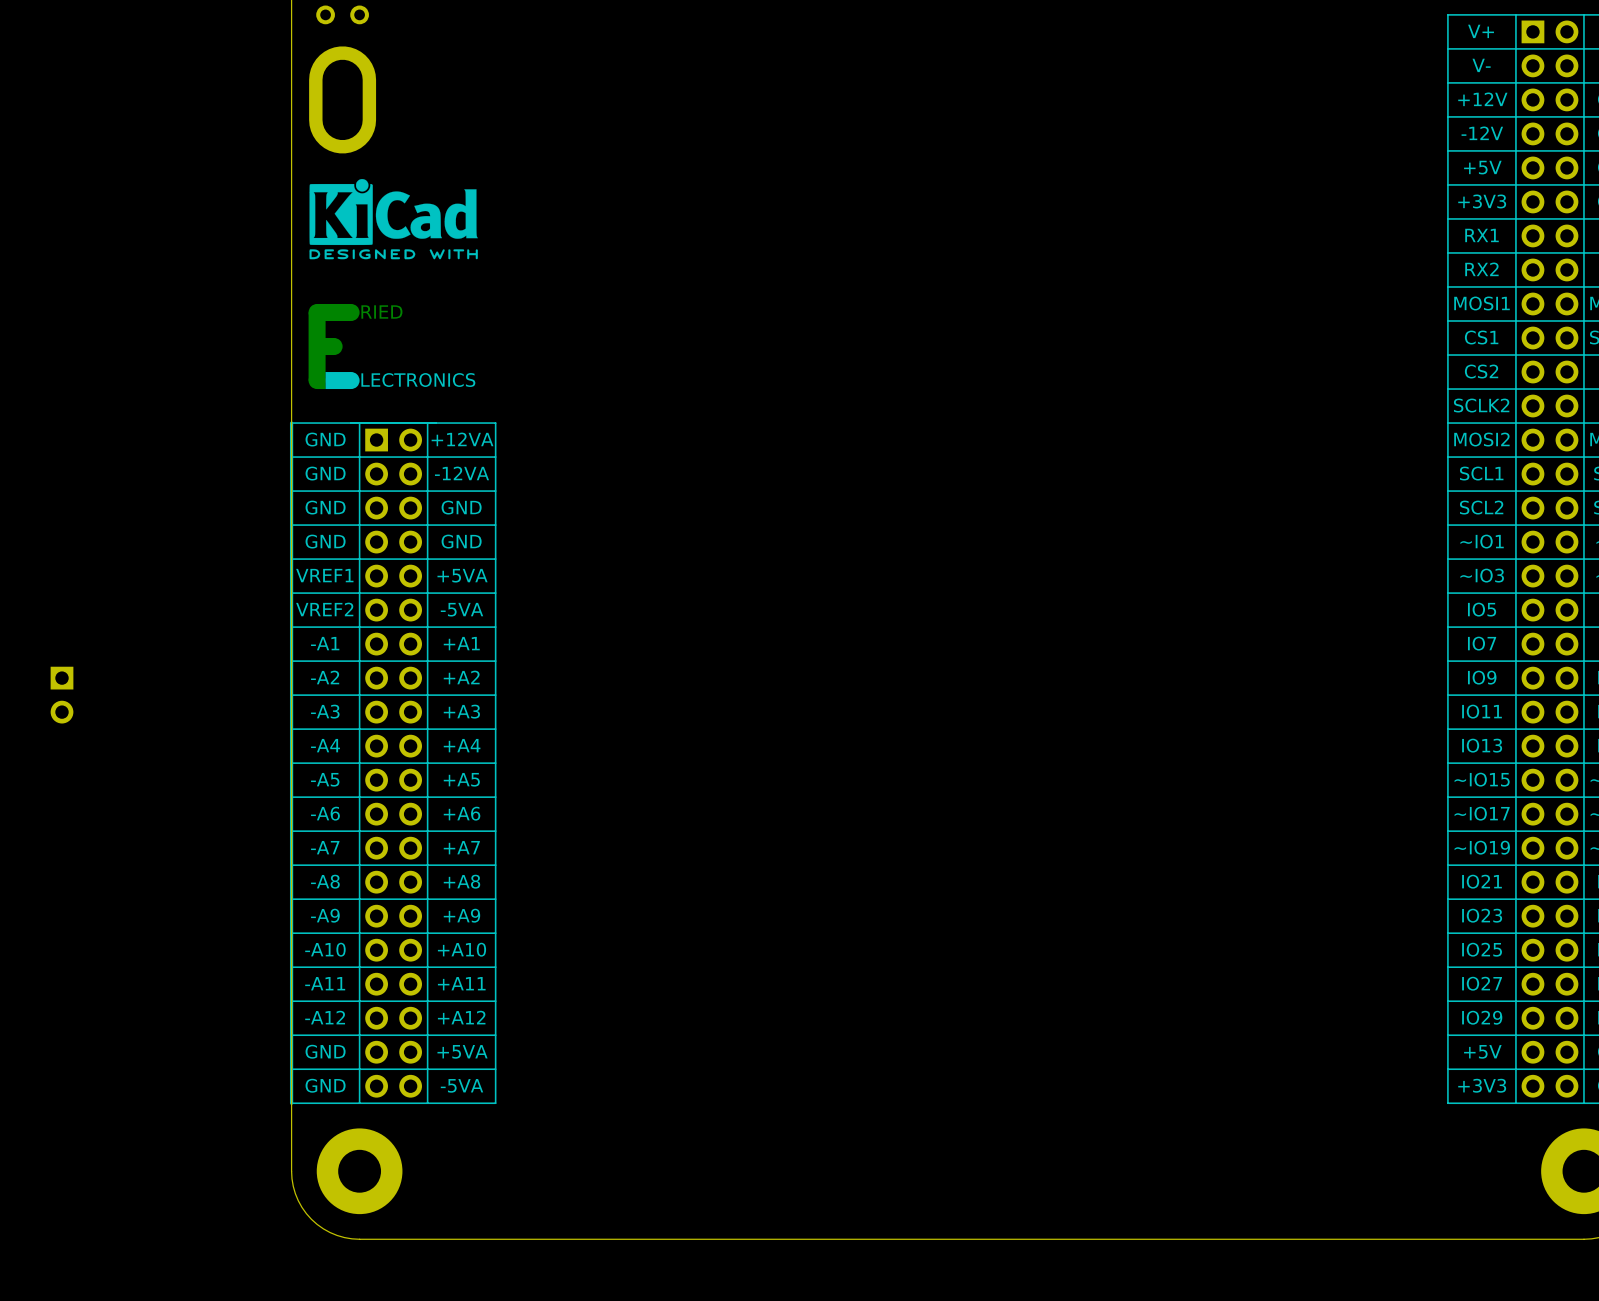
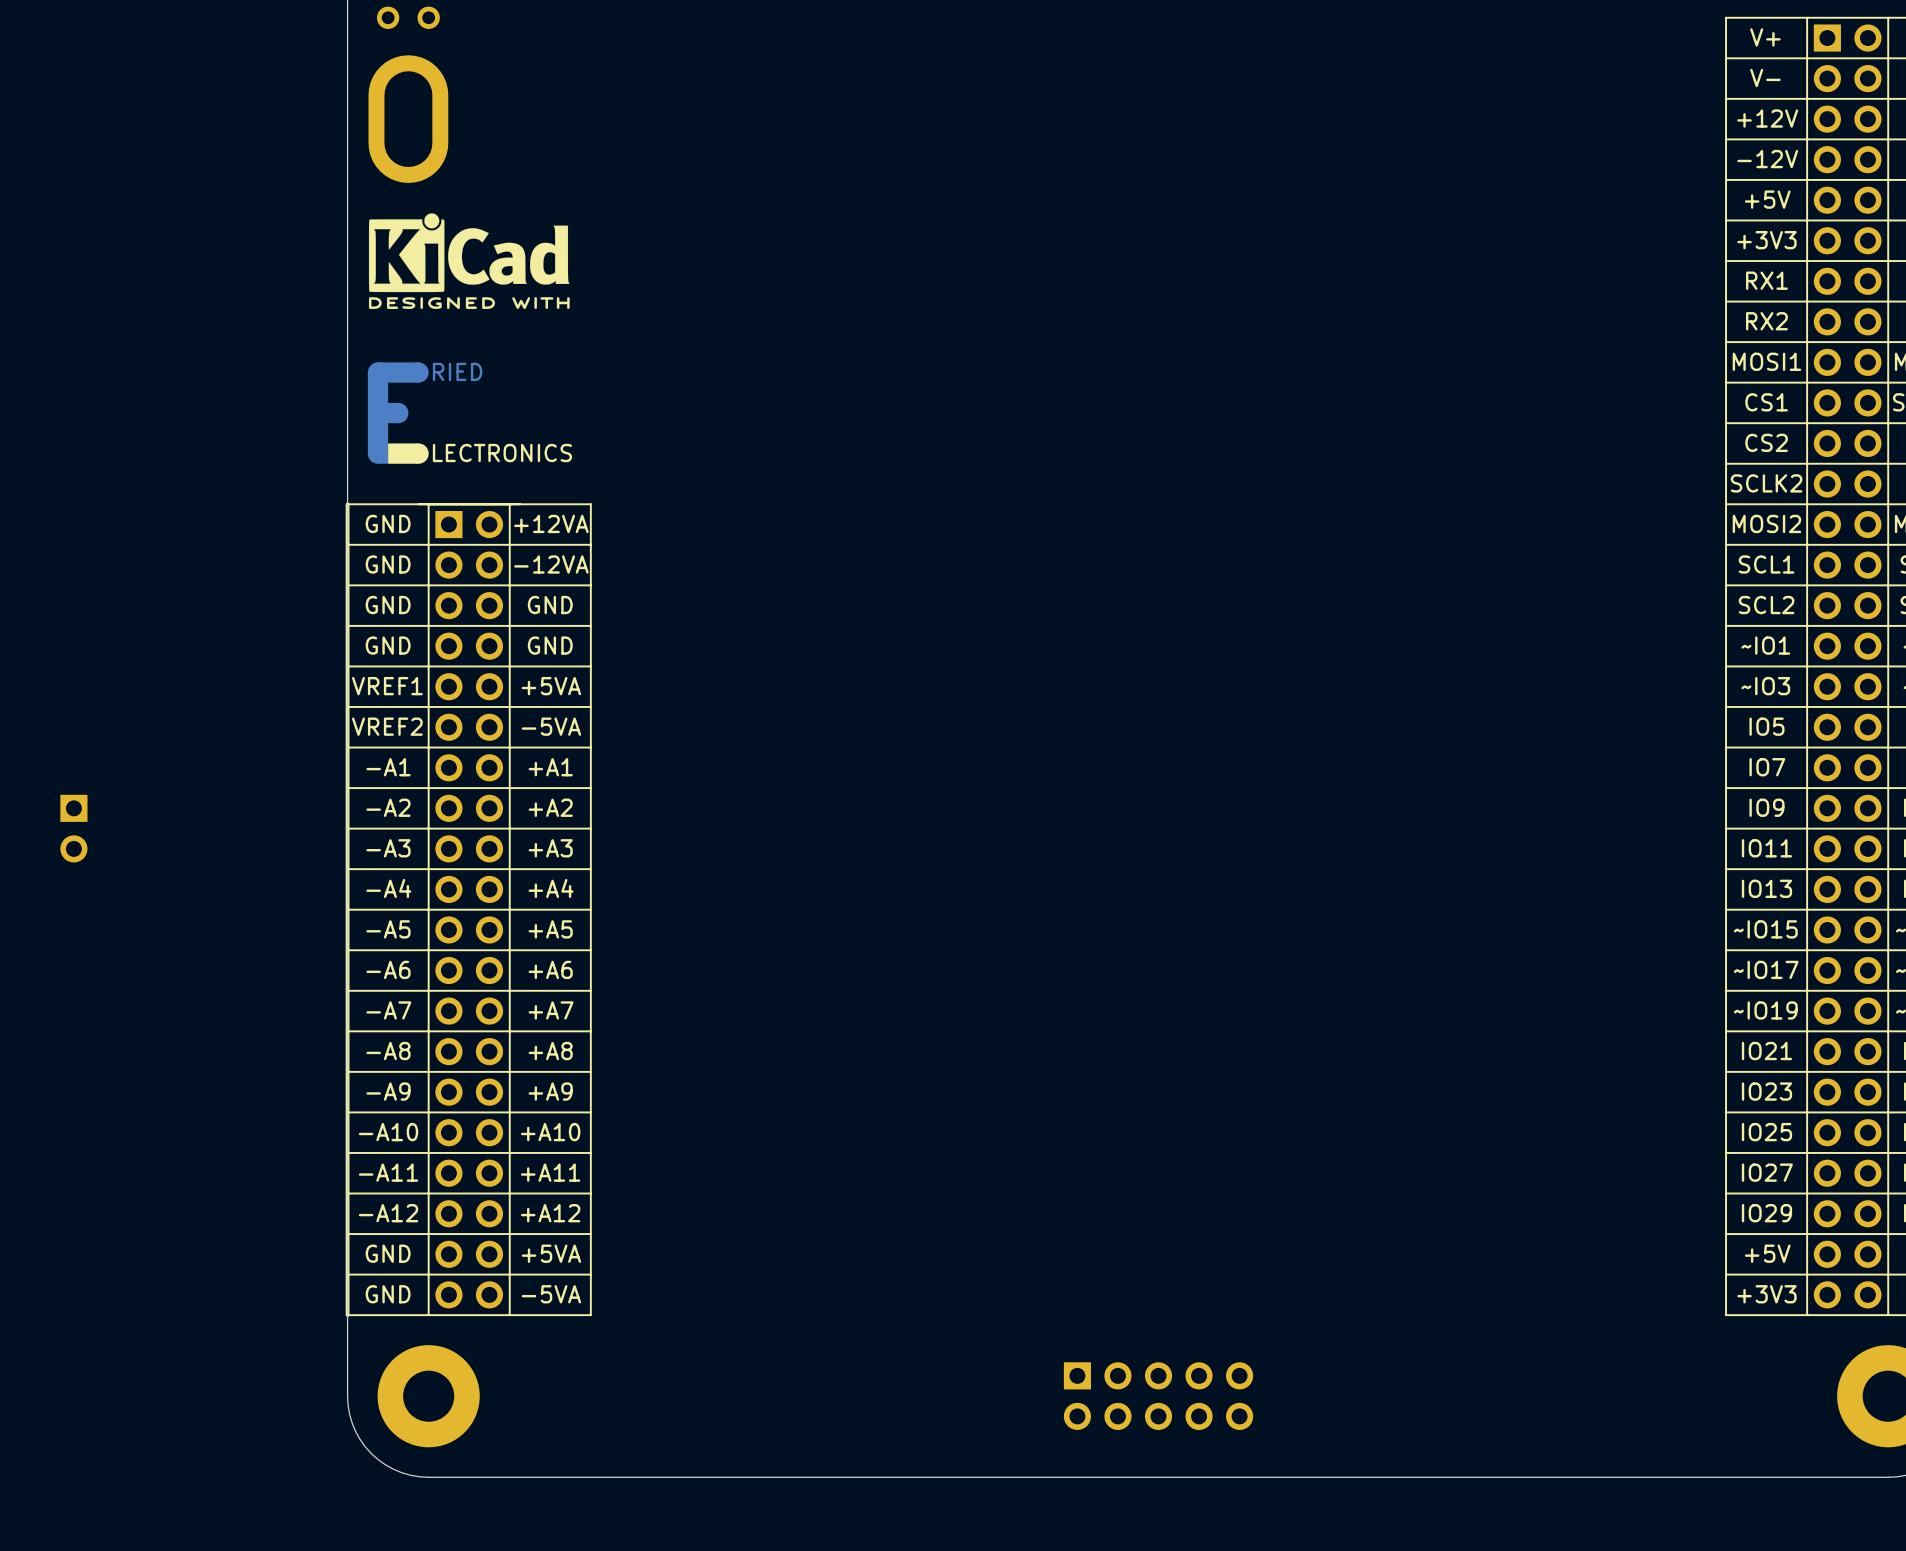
part: none -> (1158, 1396)

